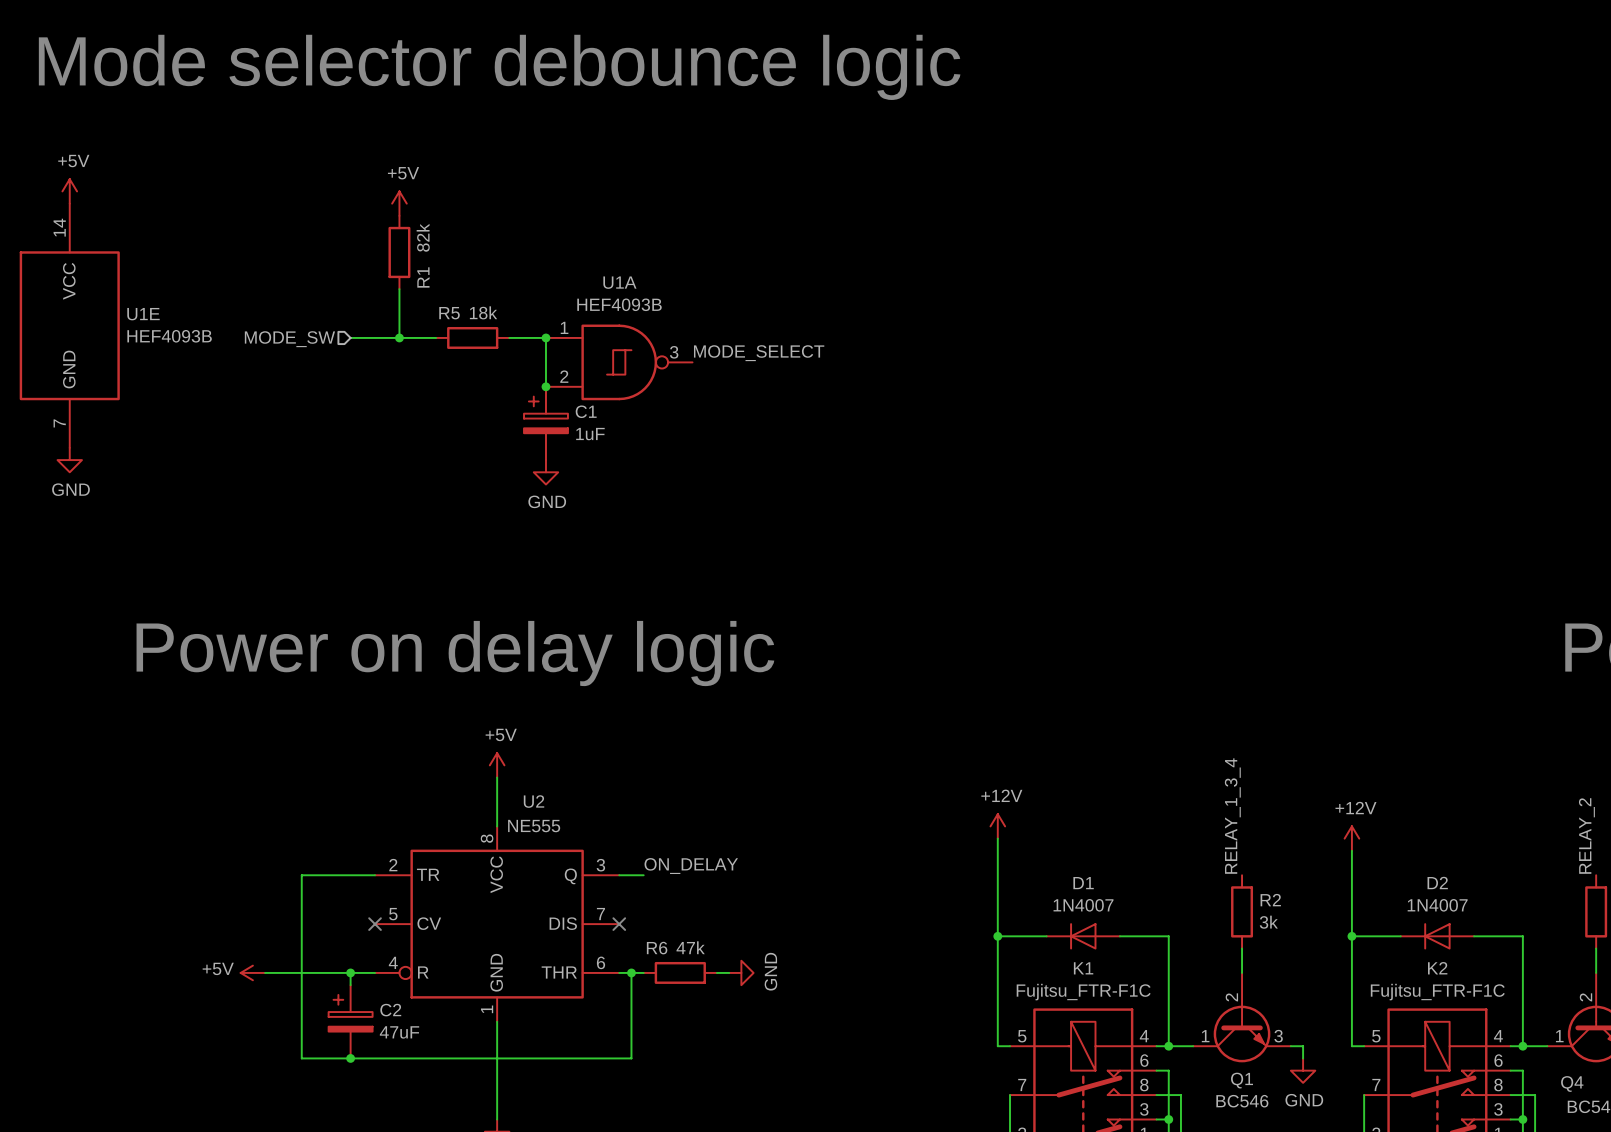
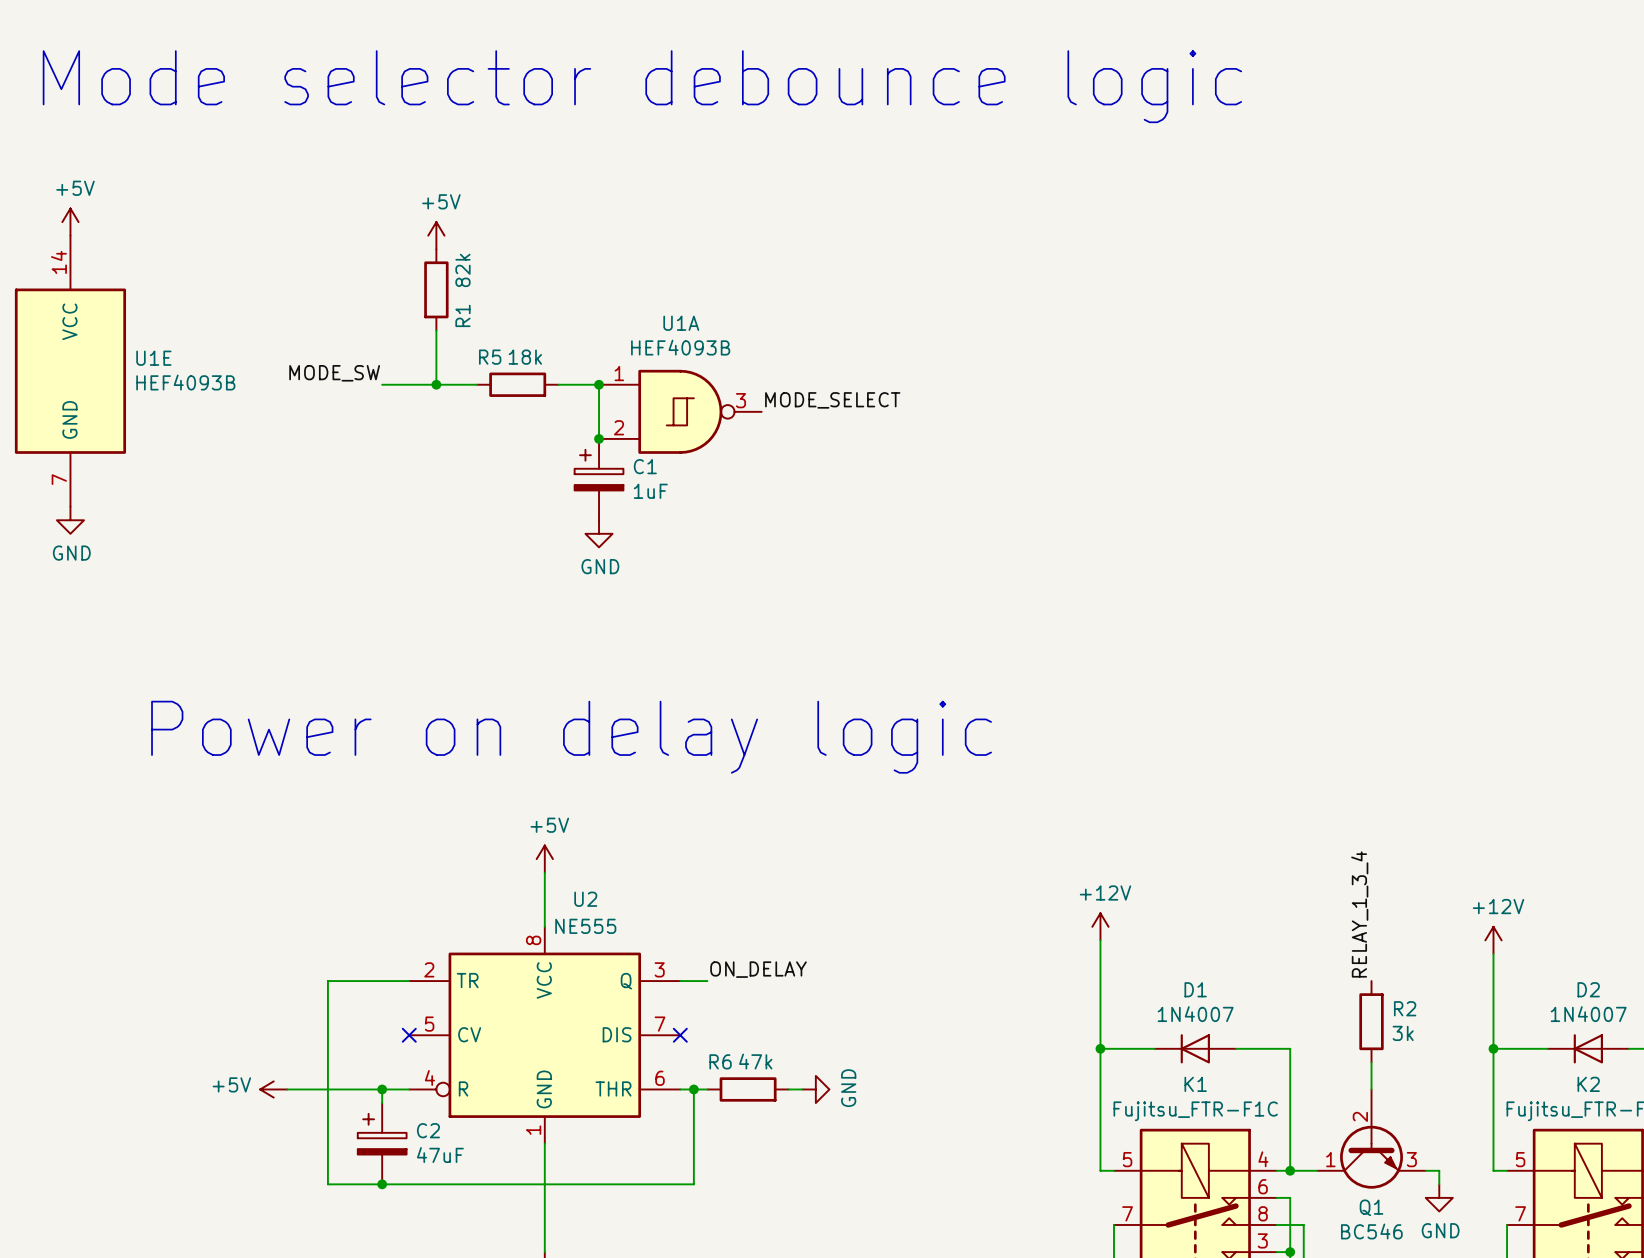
label: none -> MODE_SW (334, 373)
hierarchical label: MODE_SW (289, 339) -> none

